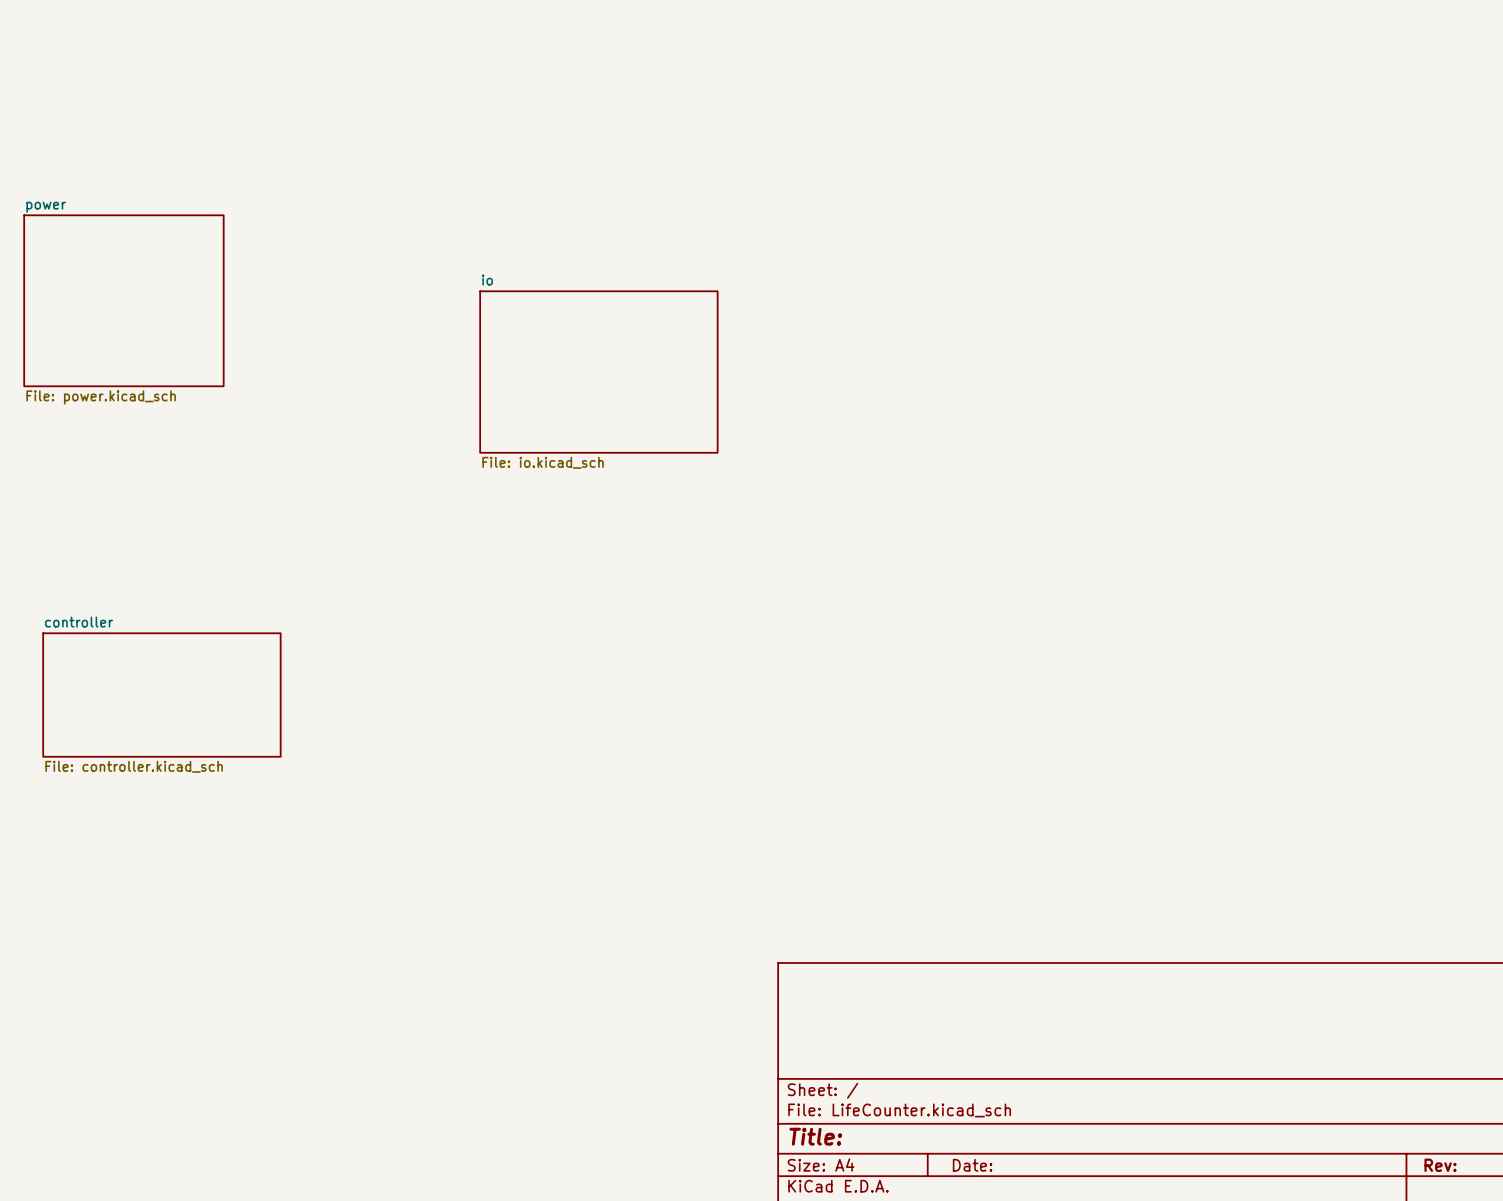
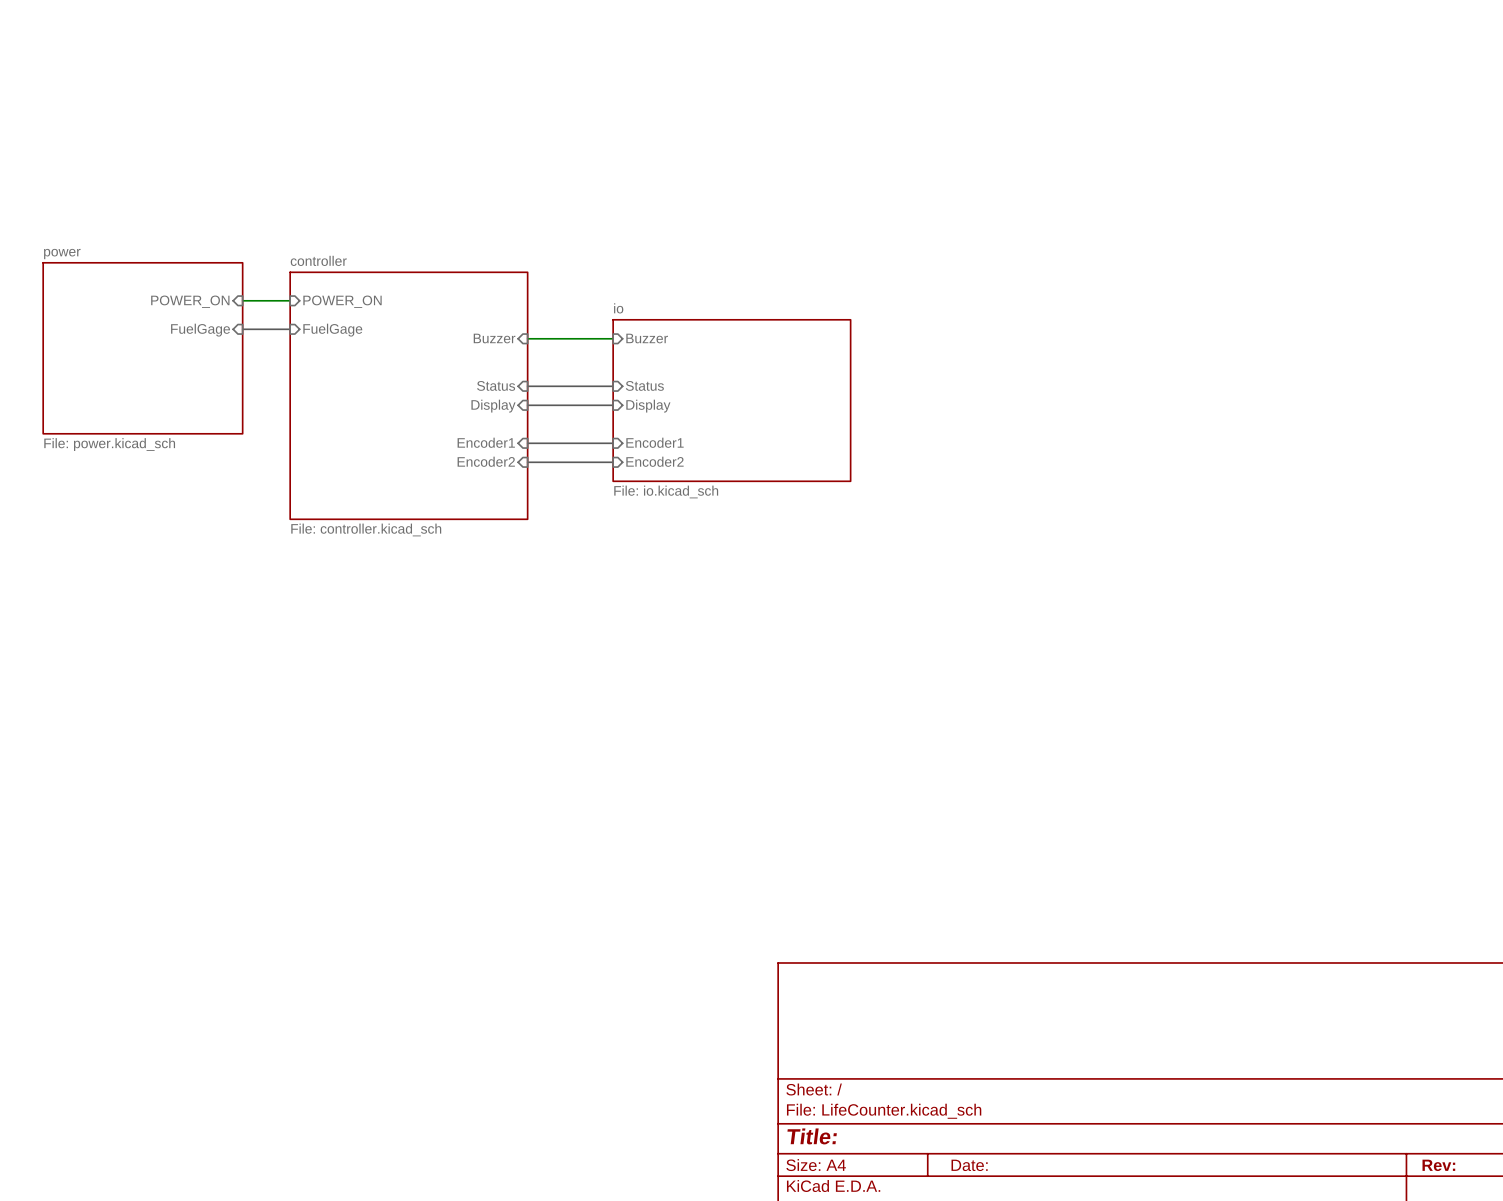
sheet power position: (123, 300) -> (142, 348)
sheet pin: none -> POWER_ON (190, 301)
wire: none -> (242, 300) (290, 300)
sheet pin: none -> POWER_ON (342, 301)
bus: none -> (242, 329) (290, 329)
sheet pin: none -> FuelGage (200, 330)
sheet pin: none -> FuelGage (332, 330)
sheet pin: none -> Buzzer (494, 338)
wire: none -> (527, 338) (613, 338)
sheet pin: none -> Buzzer (647, 338)
sheet io position: (598, 372) -> (731, 400)
sheet pin: none -> Status (496, 385)
sheet pin: none -> Status (644, 385)
bus: none -> (527, 386) (613, 386)
sheet controller: none -> File: controller.kicad_sch (408, 395)
bus: none -> (527, 405) (613, 405)
sheet pin: none -> Display (493, 406)
sheet pin: none -> Display (648, 406)
sheet pin: none -> Encoder1 (486, 442)
sheet pin: none -> Encoder1 (654, 442)
bus: none -> (527, 443) (613, 443)
sheet pin: none -> Encoder2 (486, 461)
sheet pin: none -> Encoder2 (654, 461)
bus: none -> (527, 462) (613, 462)
sheet controller: File: controller.kicad_sch (161, 695) -> none

